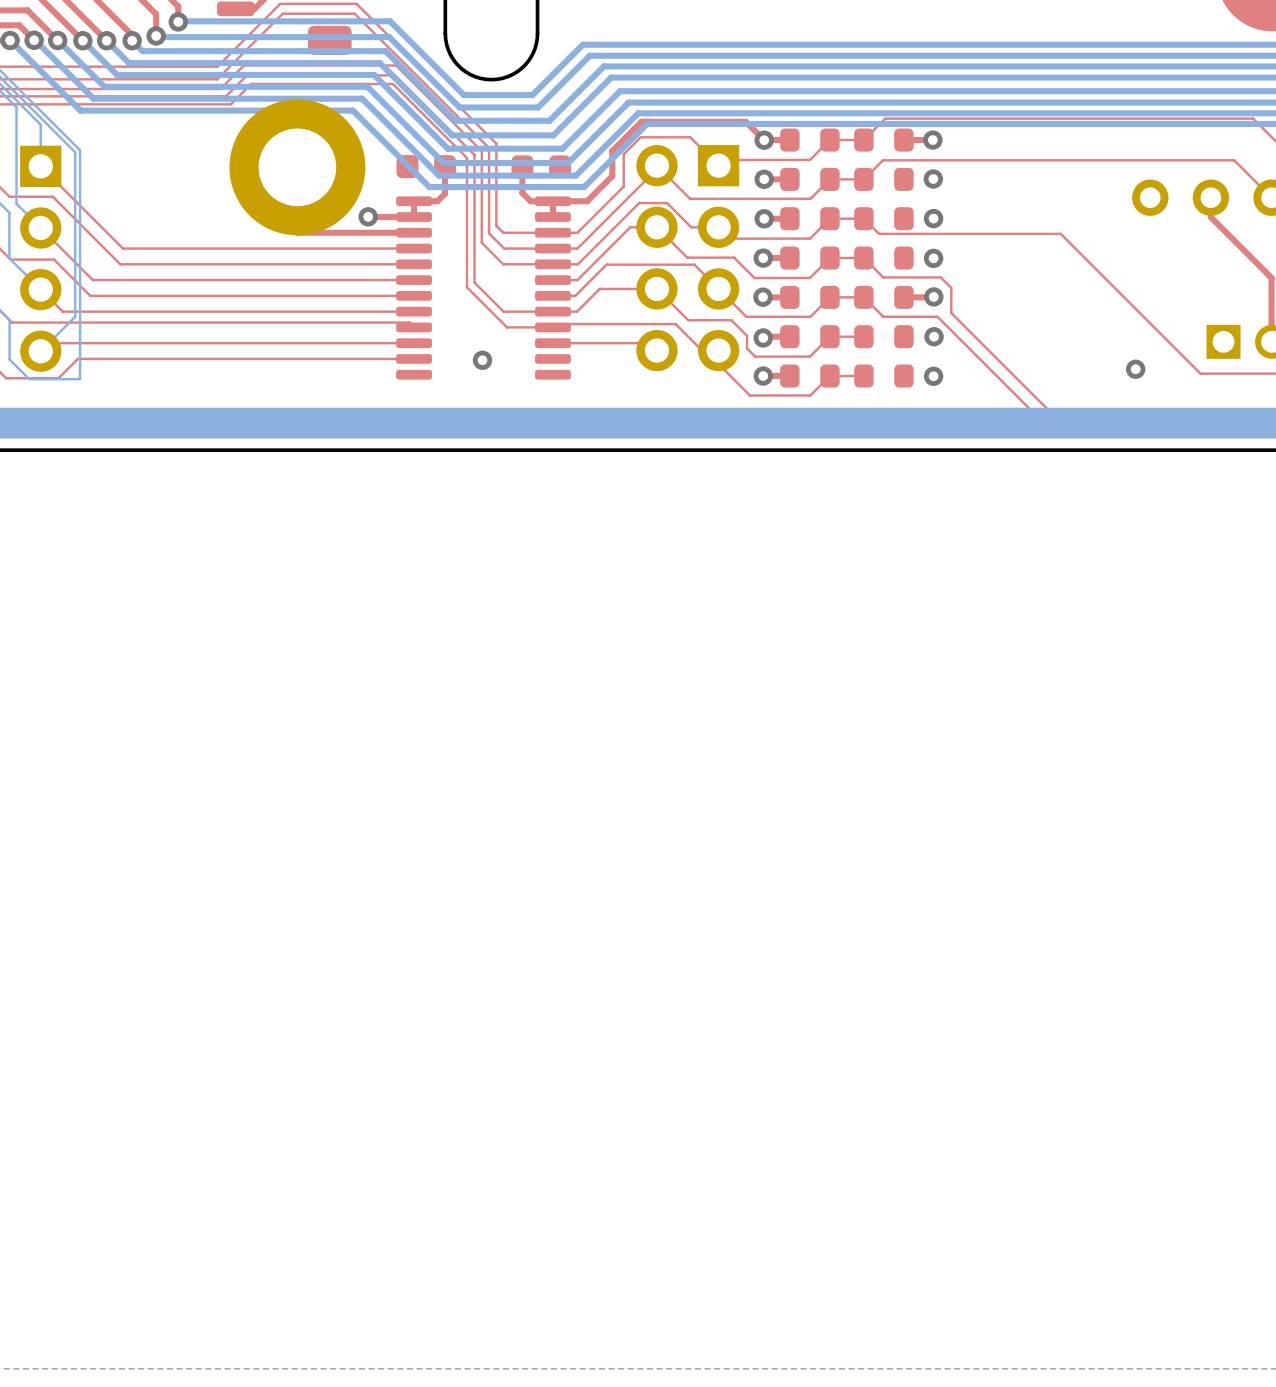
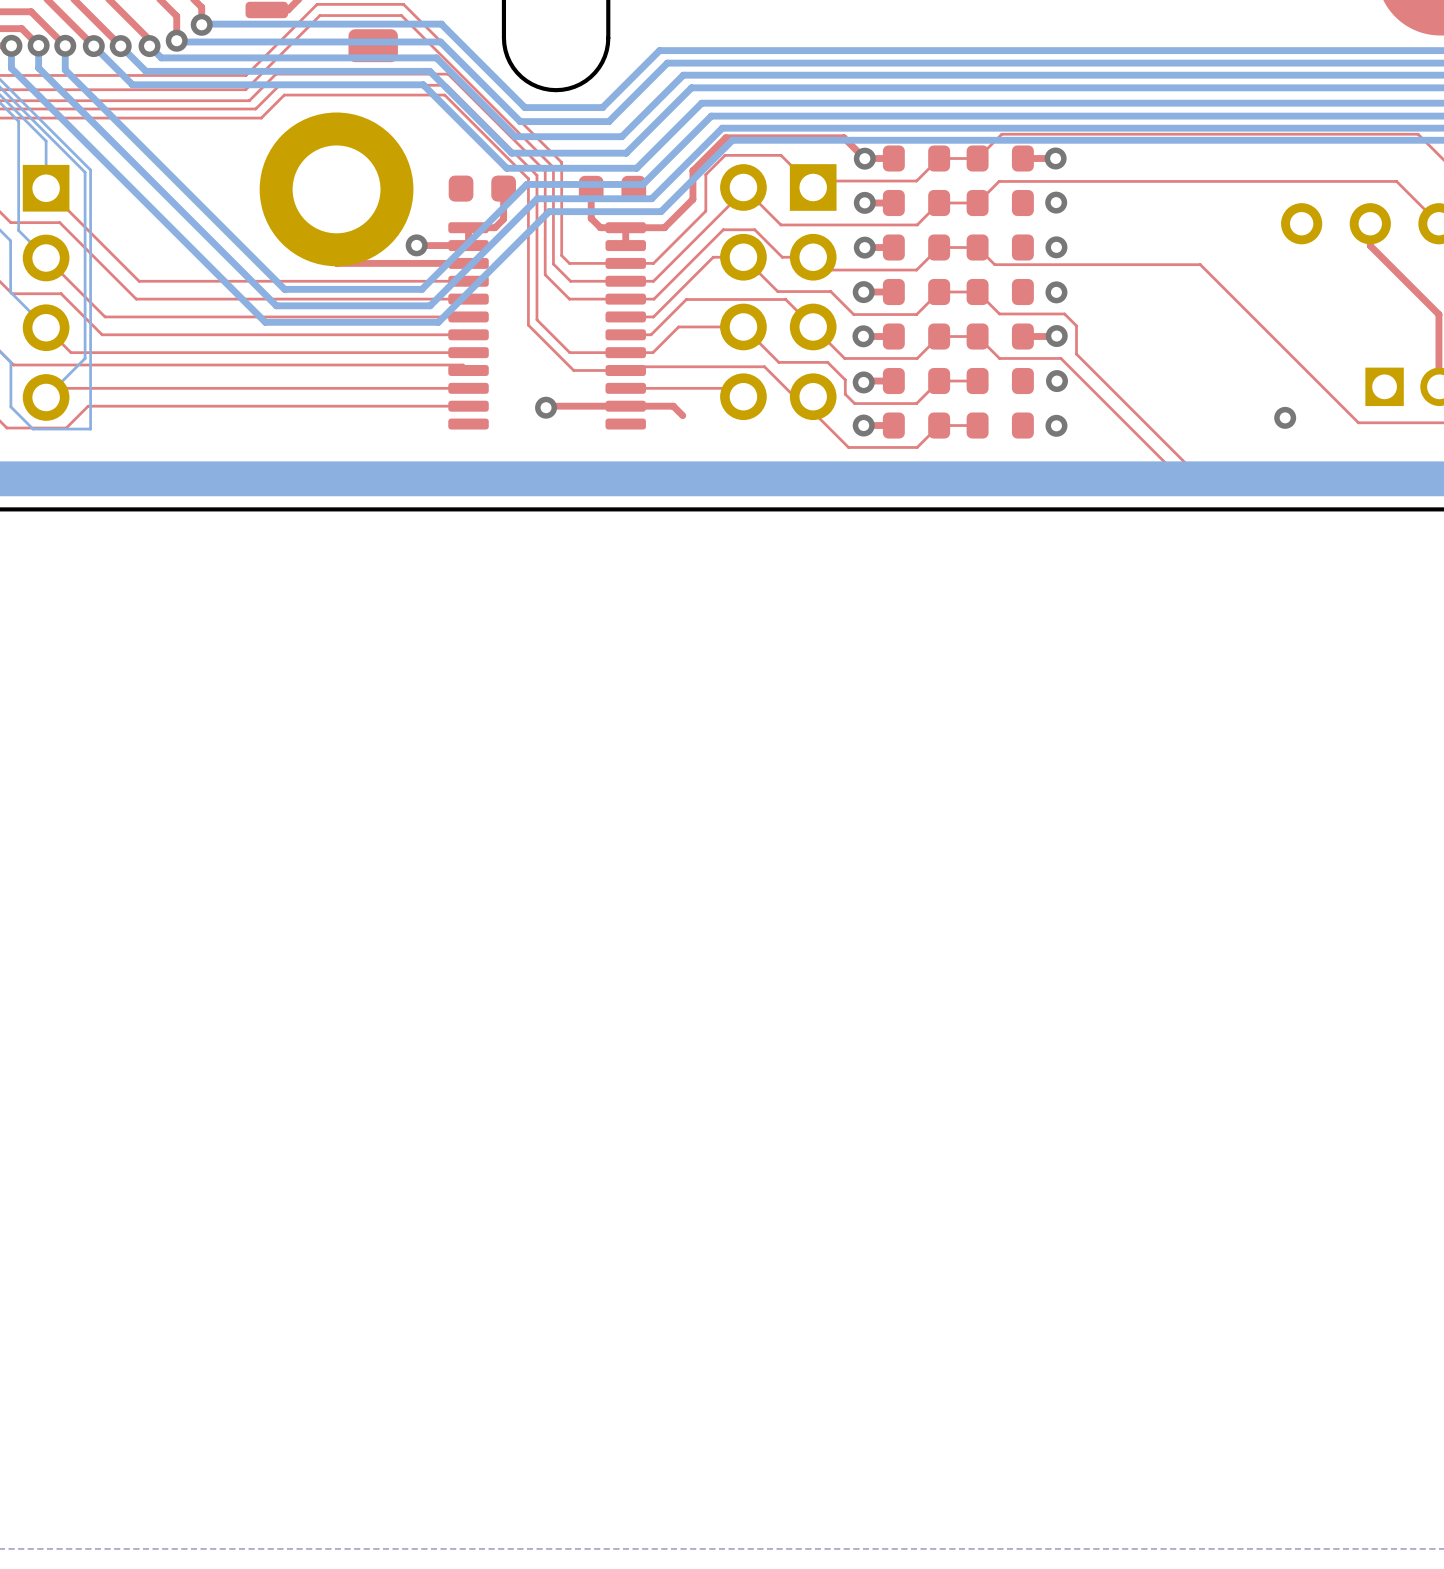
bottom track: (10, 40) (80, 110) (352, 110) (429, 187) (485, 187) -> (11, 45) (11, 68) (265, 322) (438, 322) (549, 211)
bottom track: (34, 40) (93, 98) (362, 98) (439, 175) (474, 175) -> (38, 45) (38, 68) (276, 305) (430, 305) (537, 198)
bottom track: (58, 40) (104, 86) (367, 86) (443, 163) (465, 163) -> (65, 45) (65, 69) (284, 289) (421, 289) (526, 184)
top track: none -> (546, 407) (673, 406) (682, 415)

